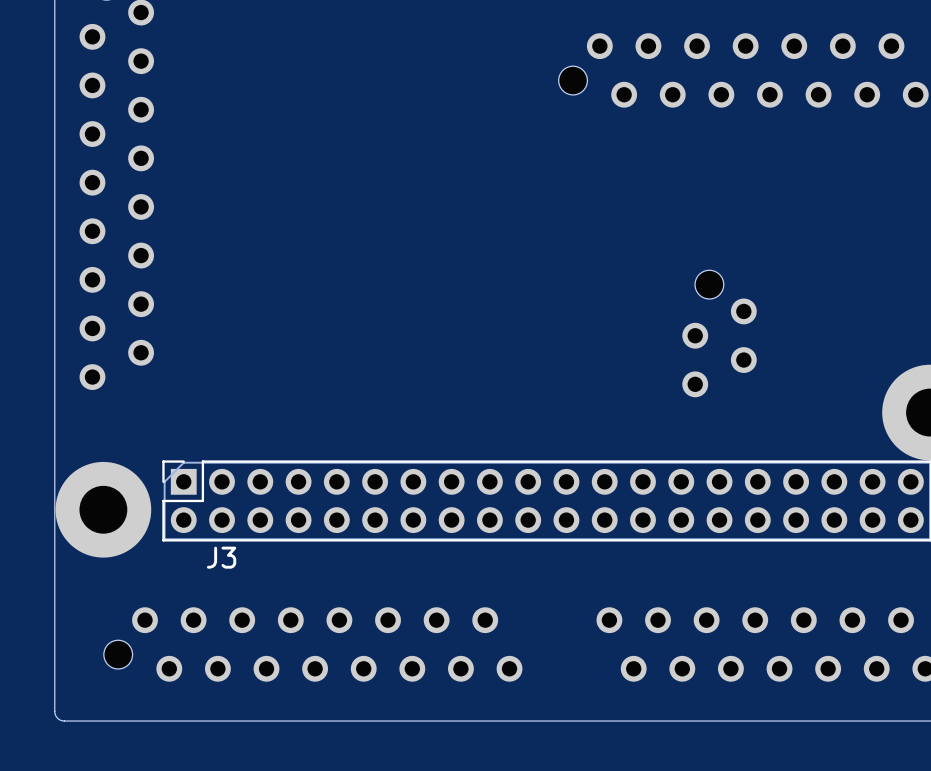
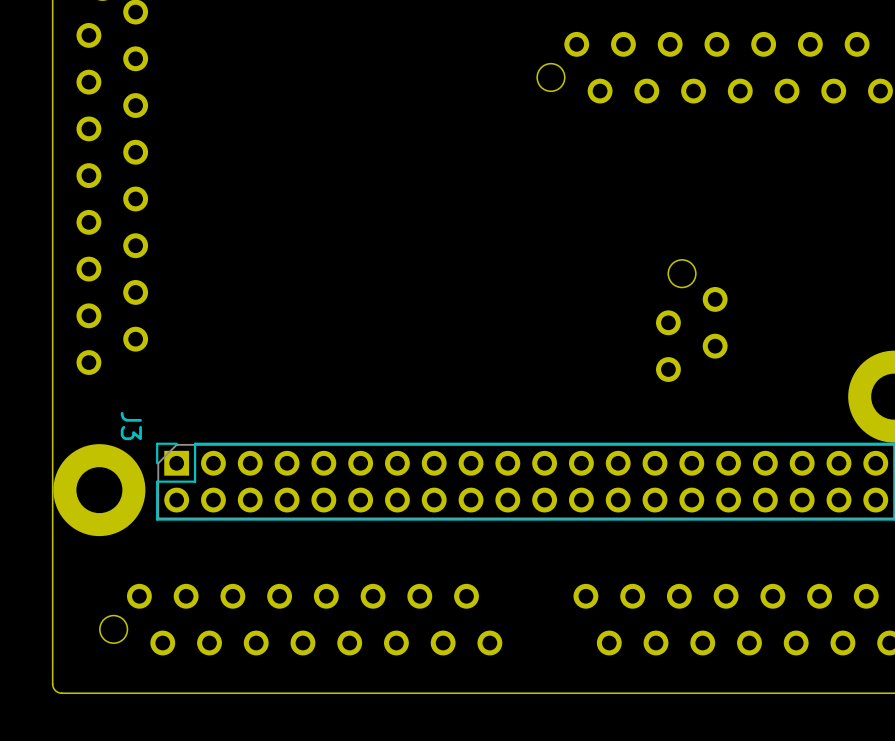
J3 name rotation: 0° (221, 557) -> 90° clockwise (131, 426)
J3 name position: J3 (221, 557) -> J3 (131, 426)

